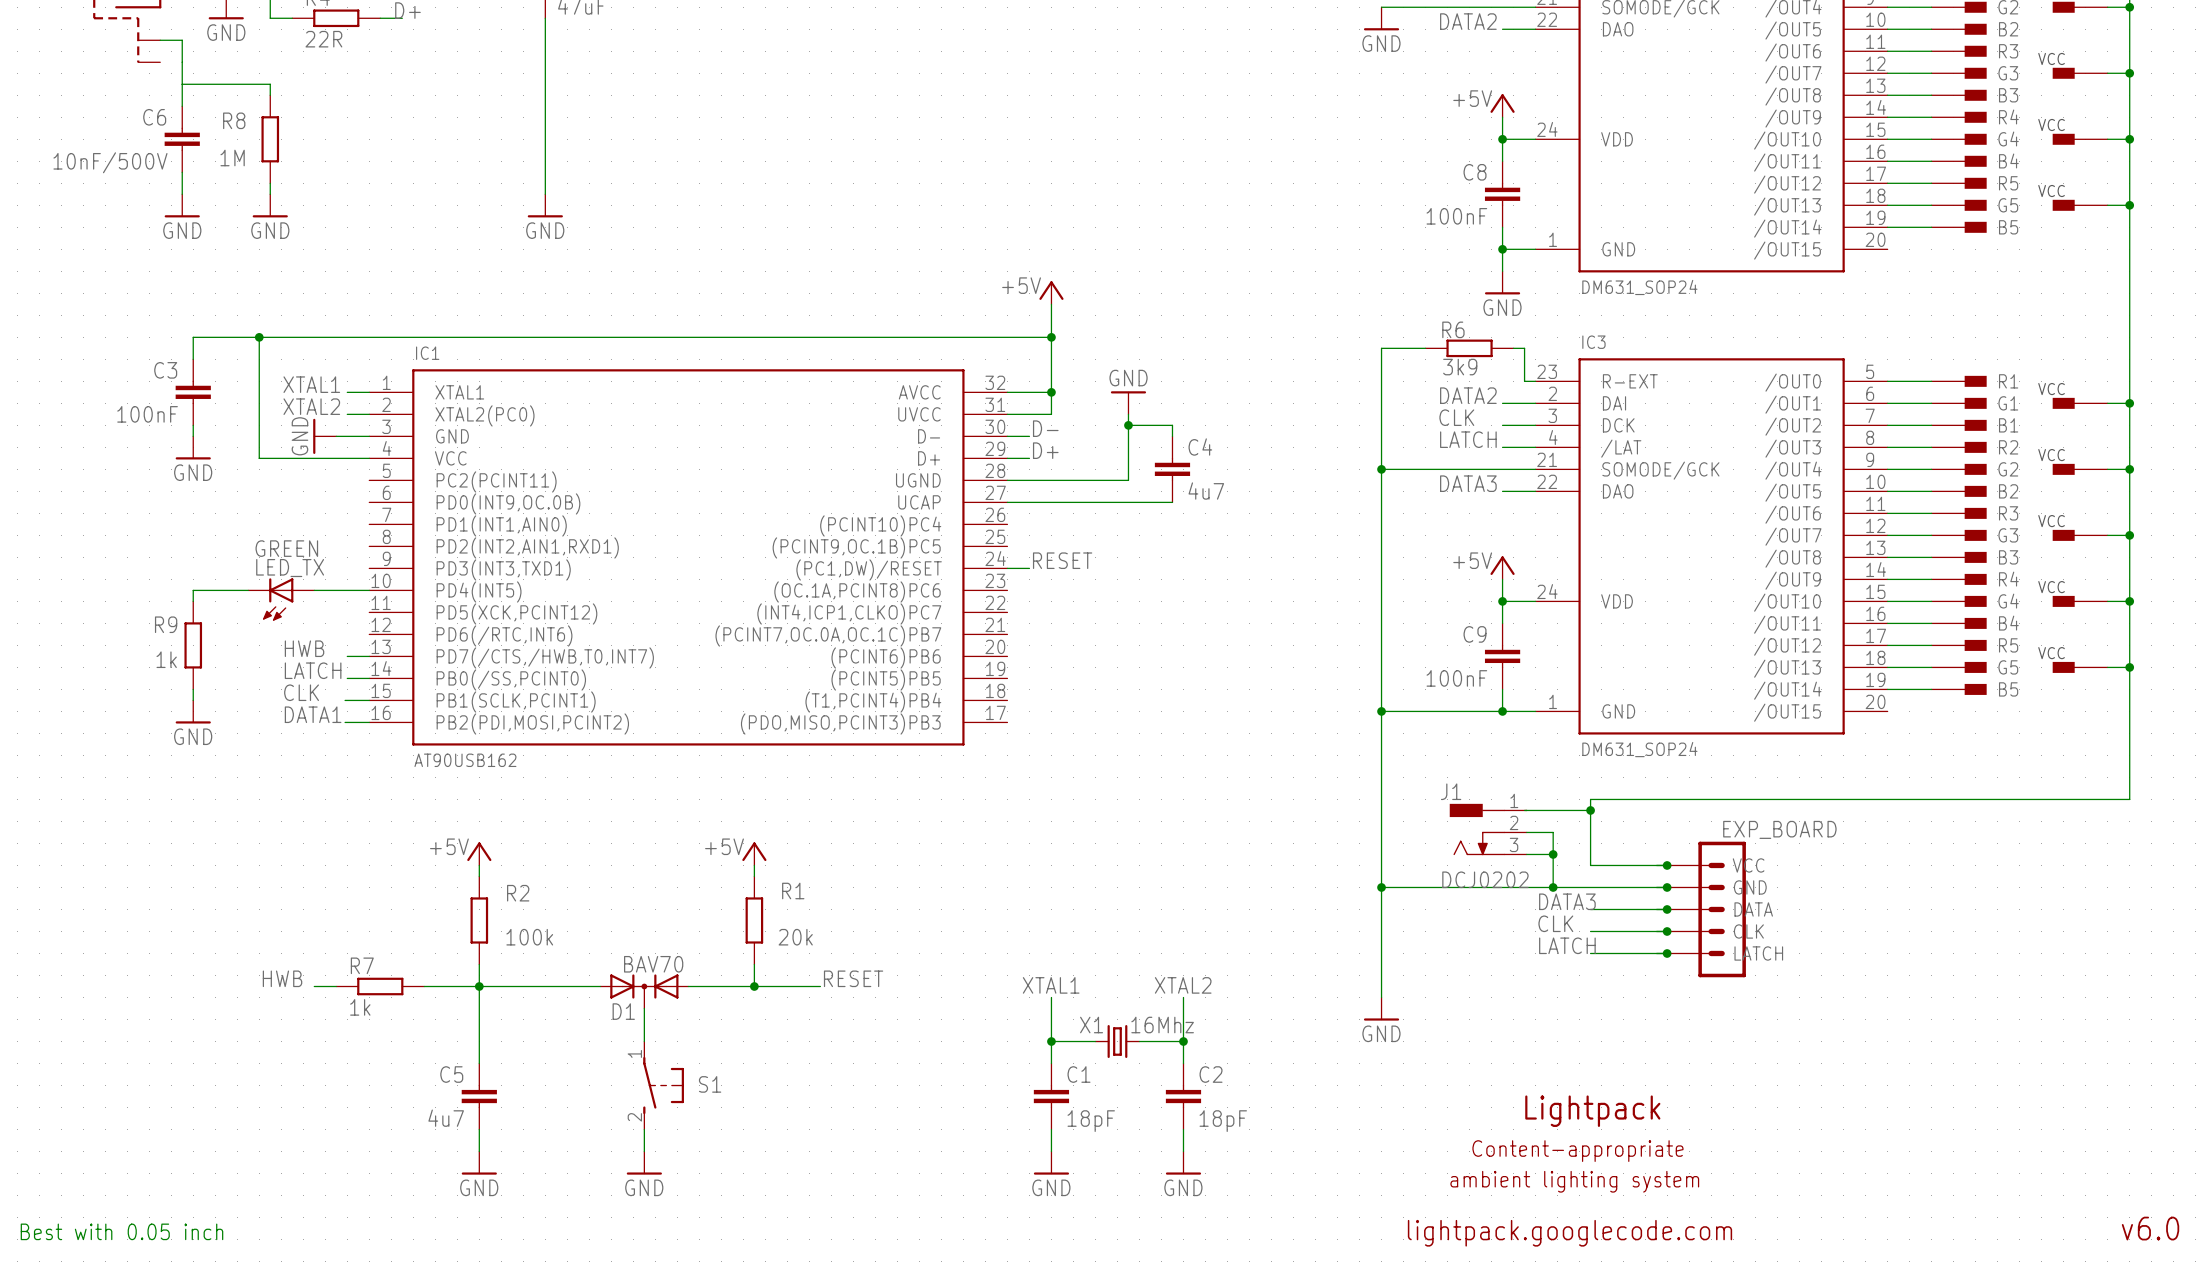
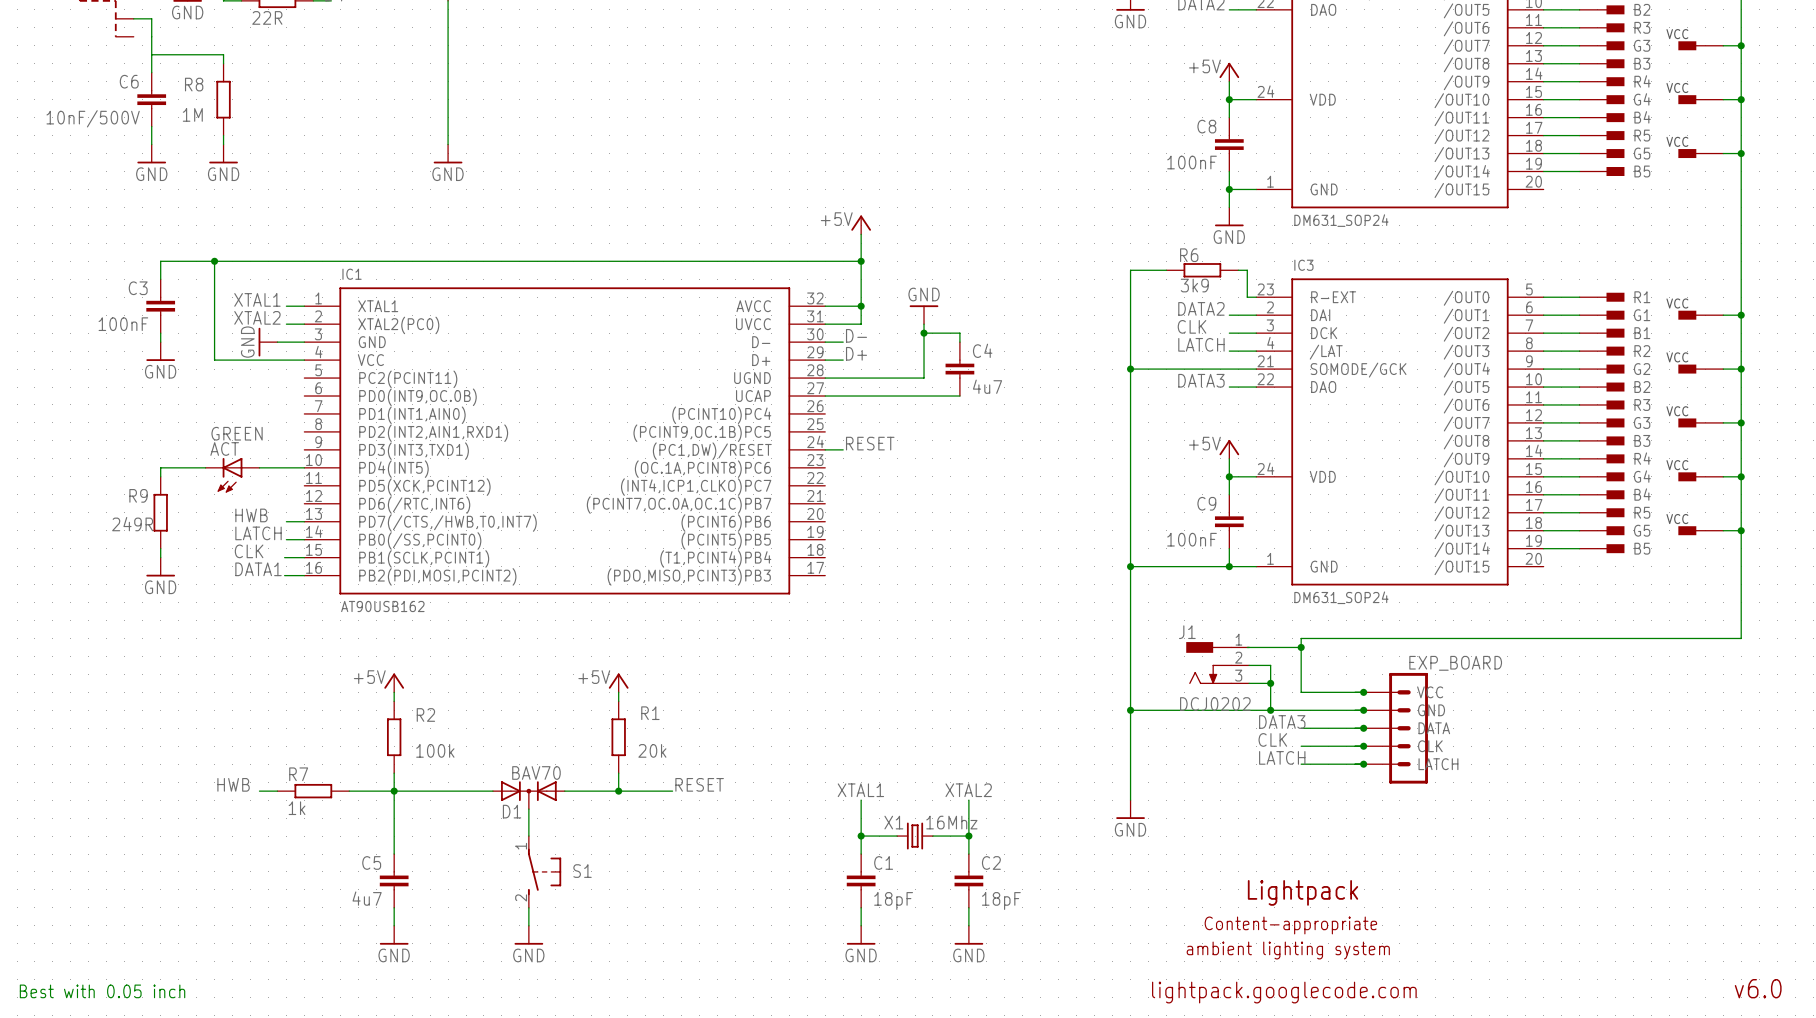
LED_TX name: LED_TX (290, 568) -> ACT (224, 448)
R9 value: 1k (166, 659) -> 249R (132, 524)

